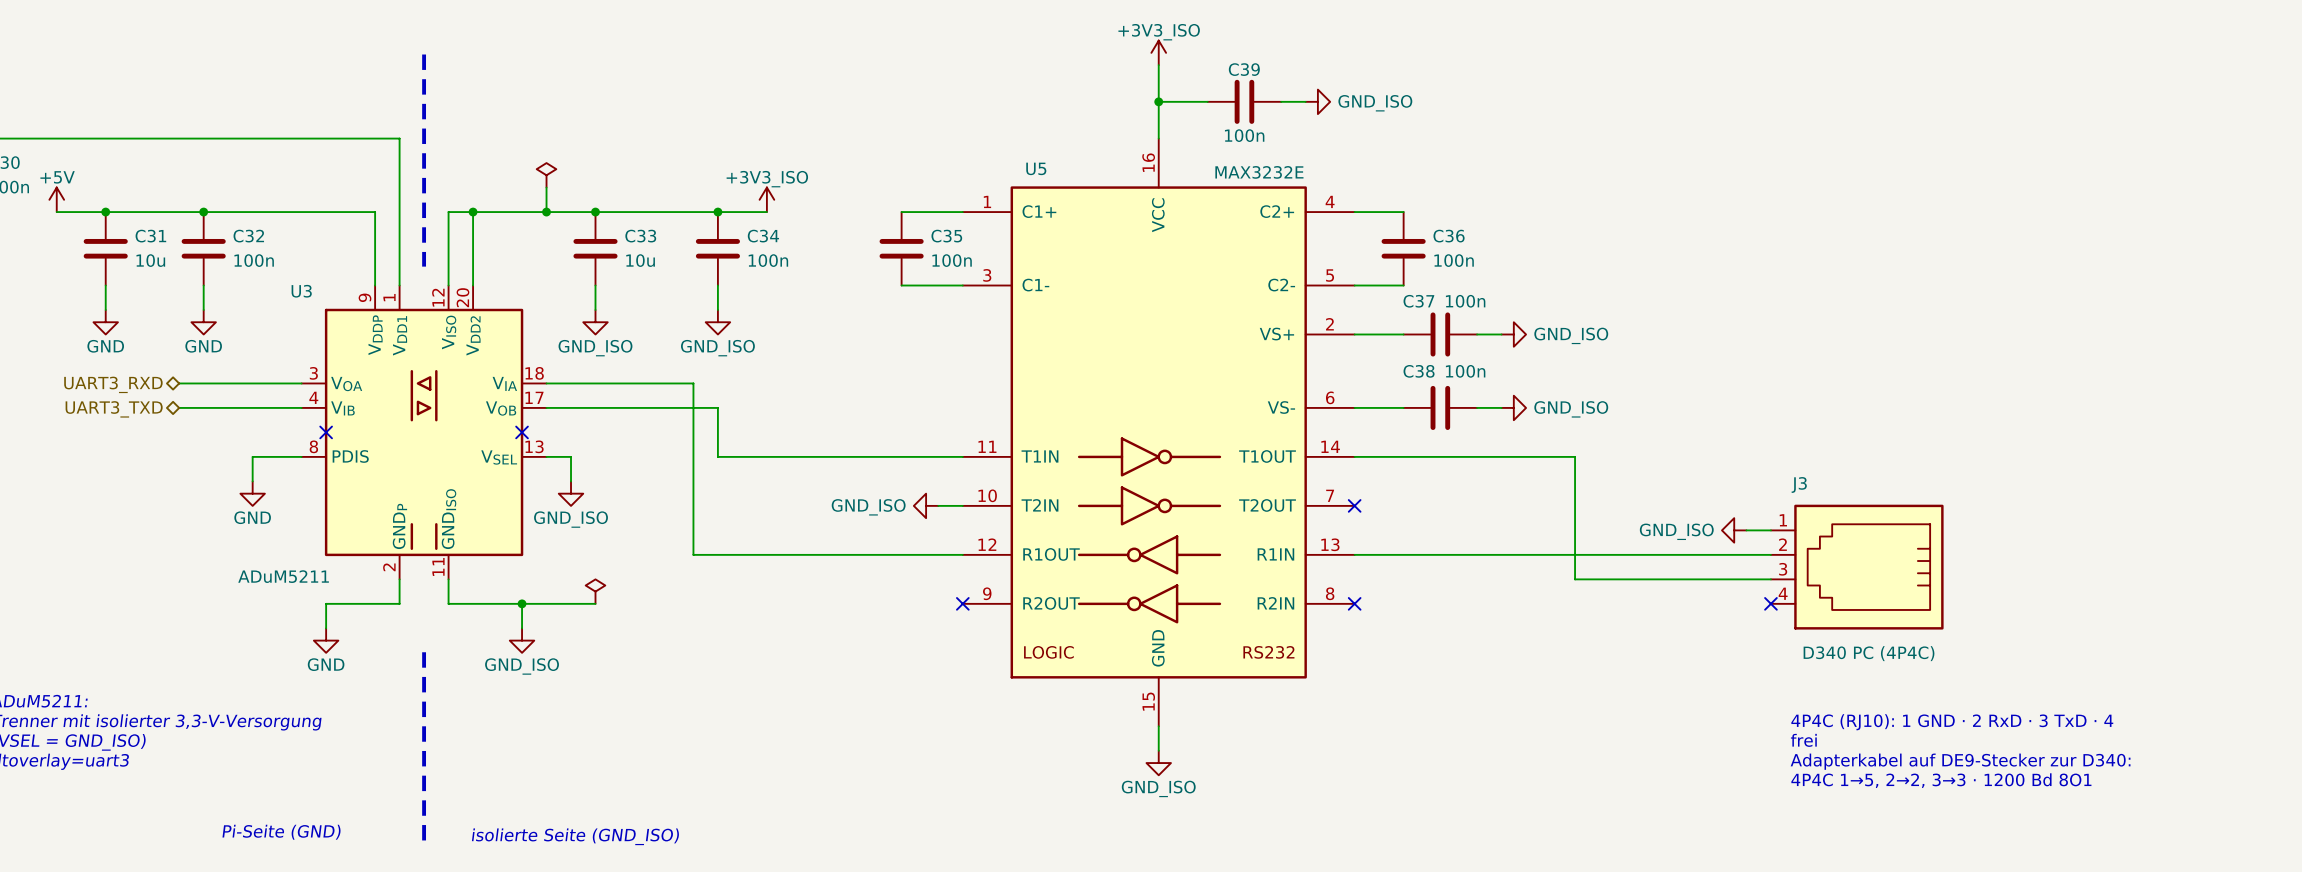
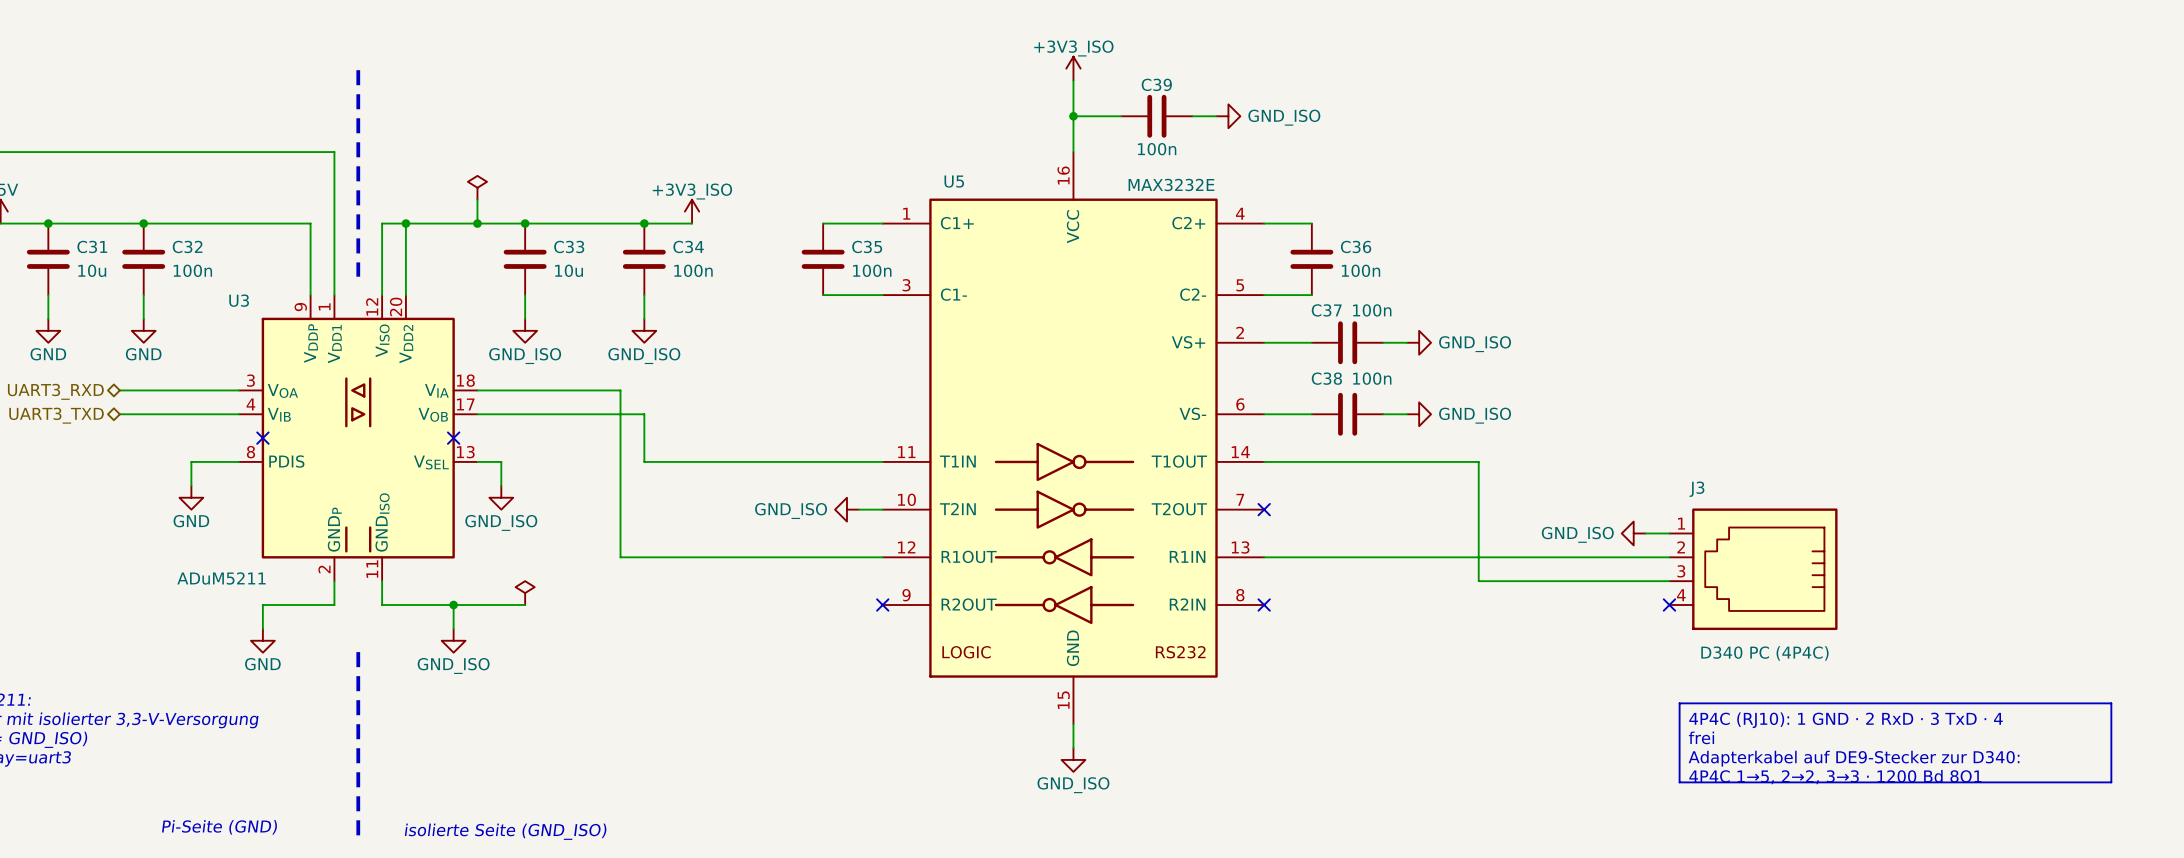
line: none -> (1679, 703) (2111, 703) (2111, 782) (1679, 782) (1679, 703)

